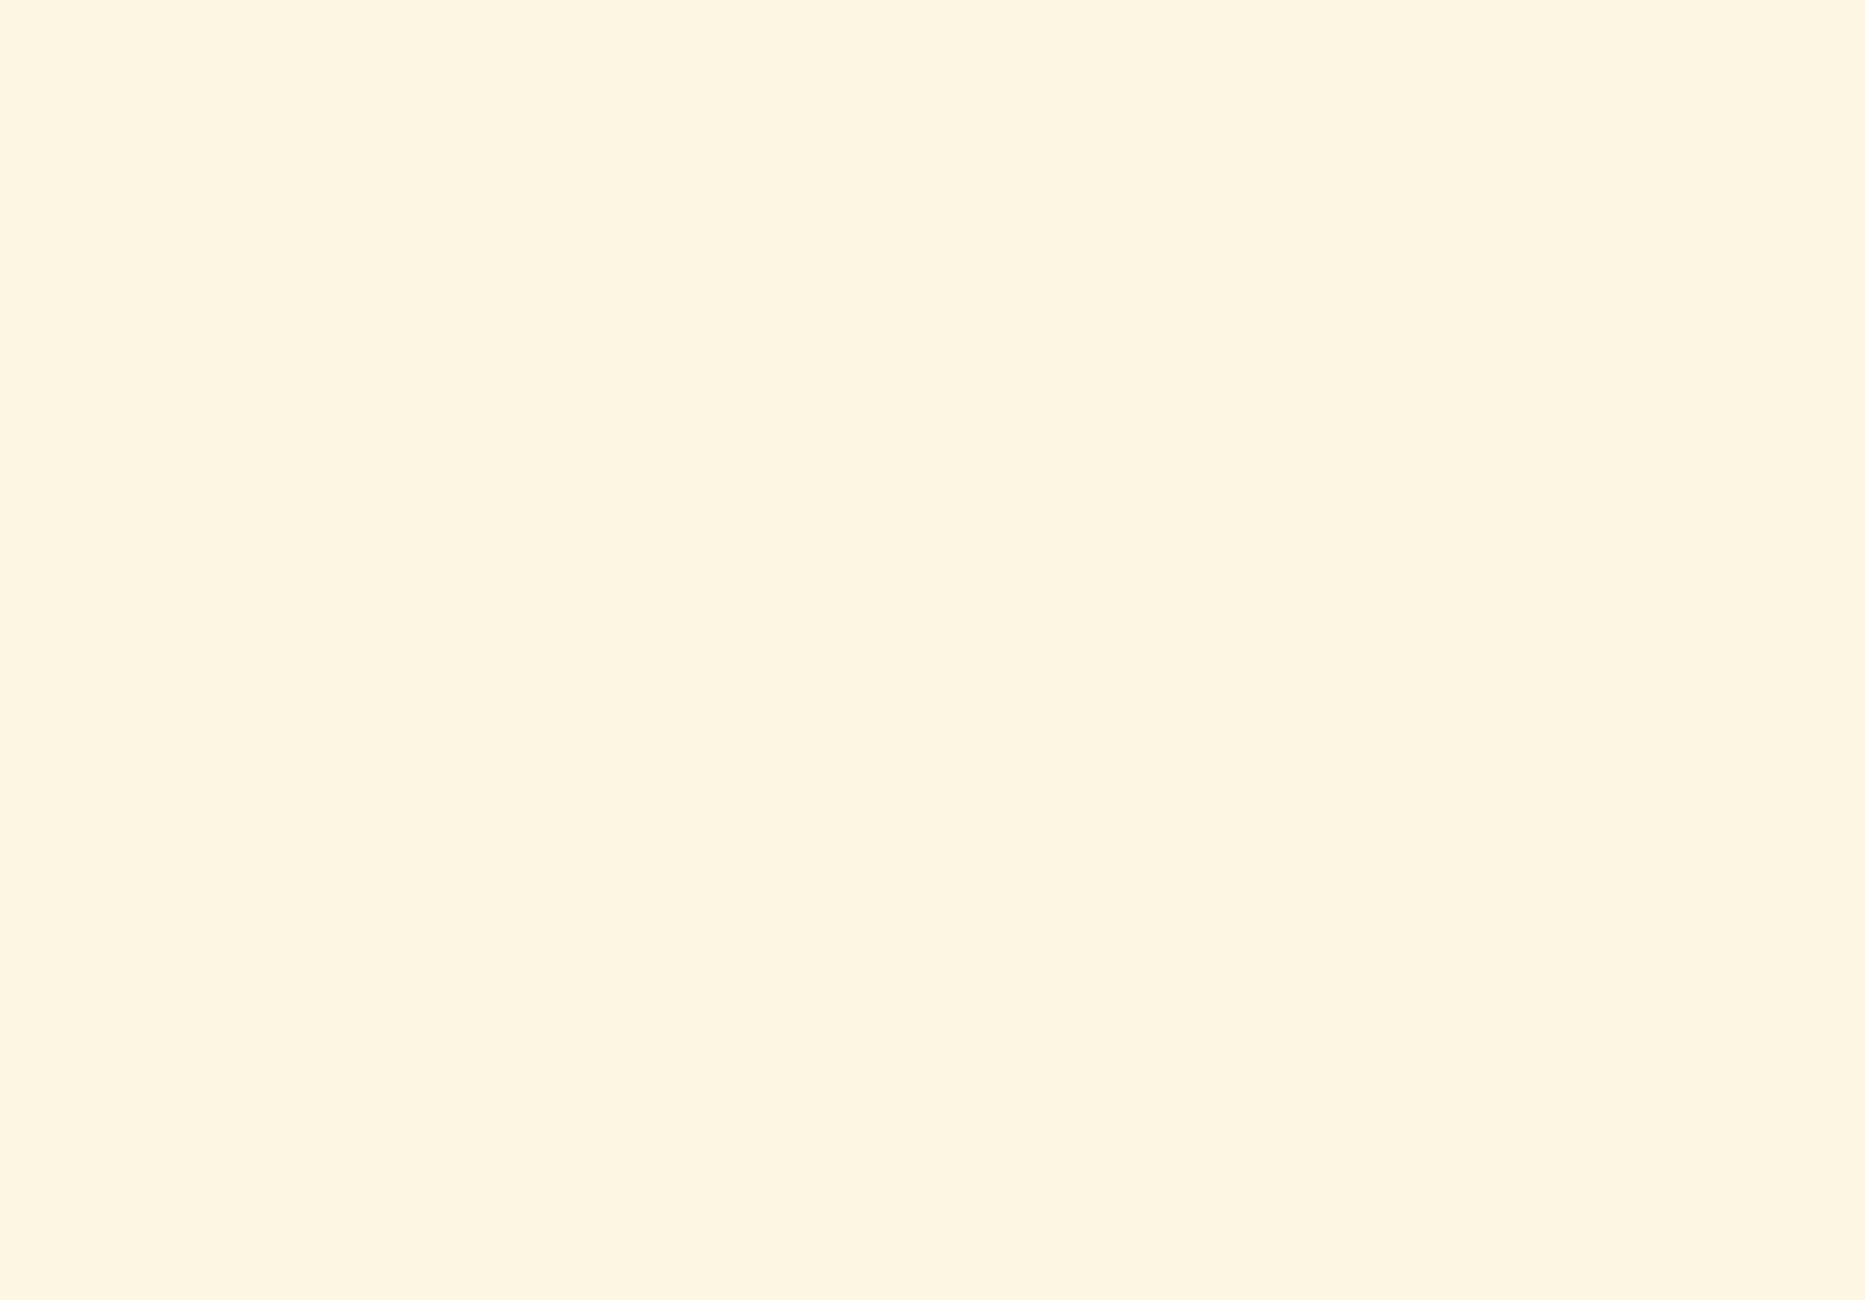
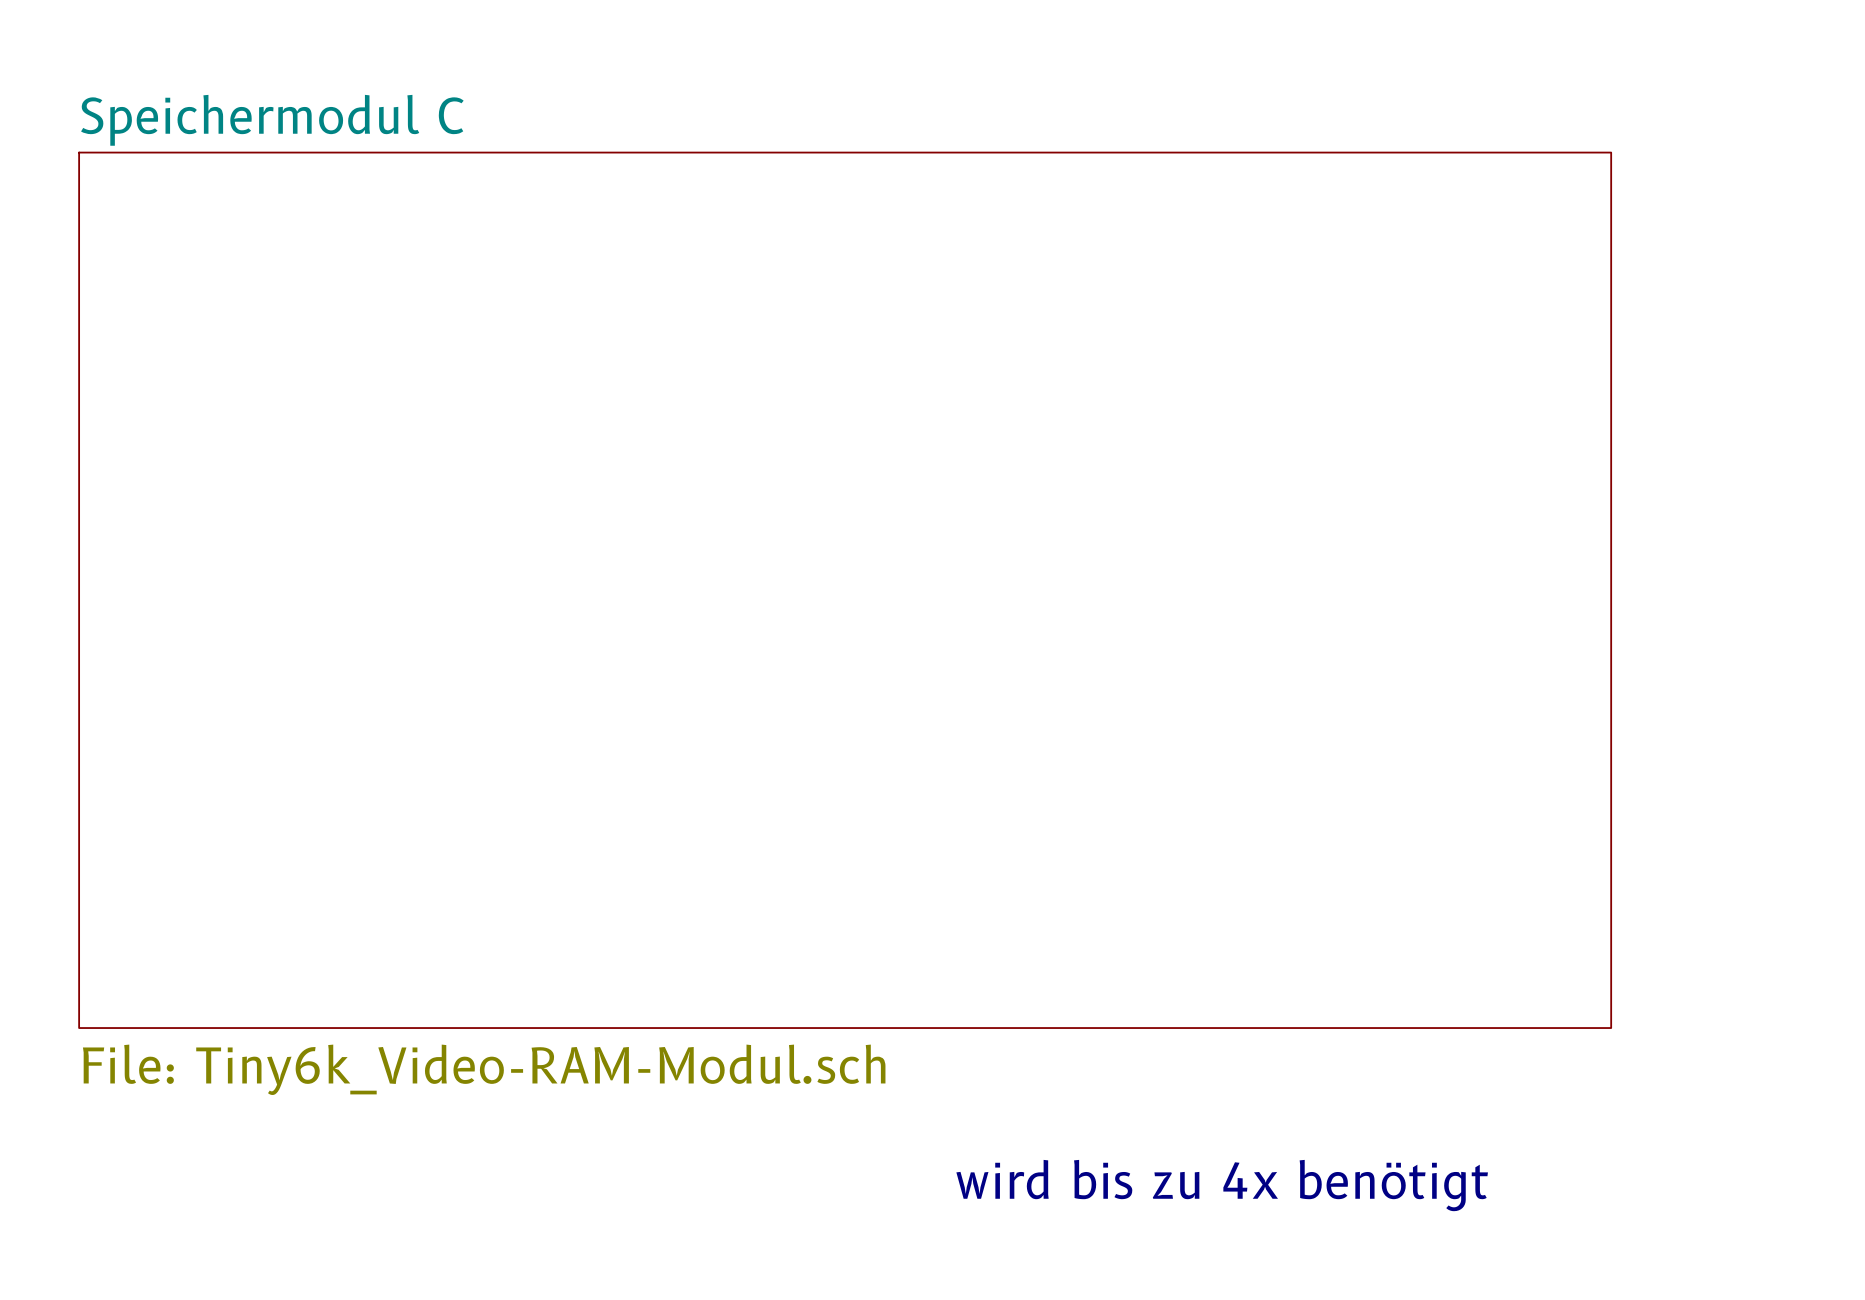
sheet Speichermodul C: none -> File: Tiny6k_Video-RAM-Modul.sch (845, 590)
text: none -> wird bis zu 4x benötigt (1222, 1185)

